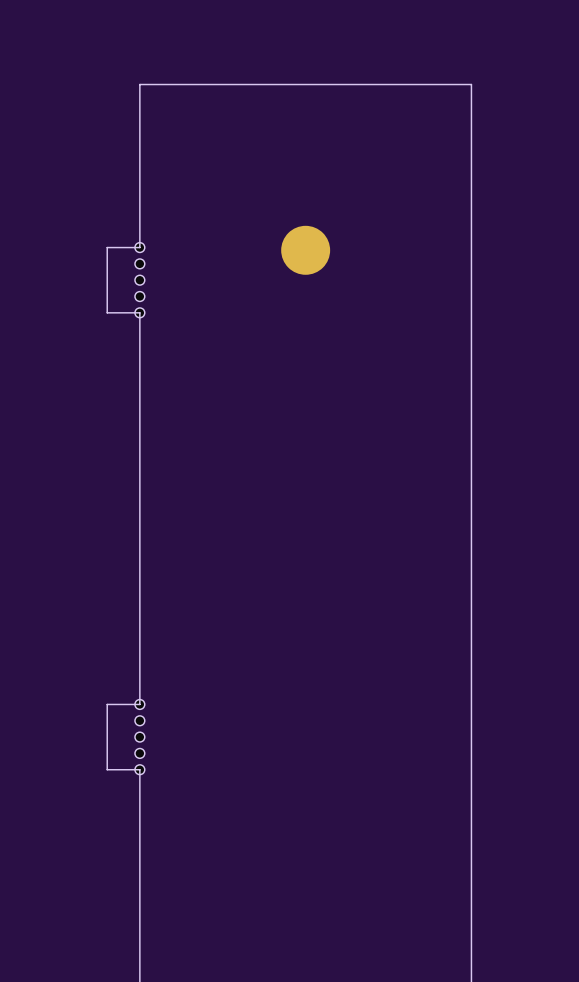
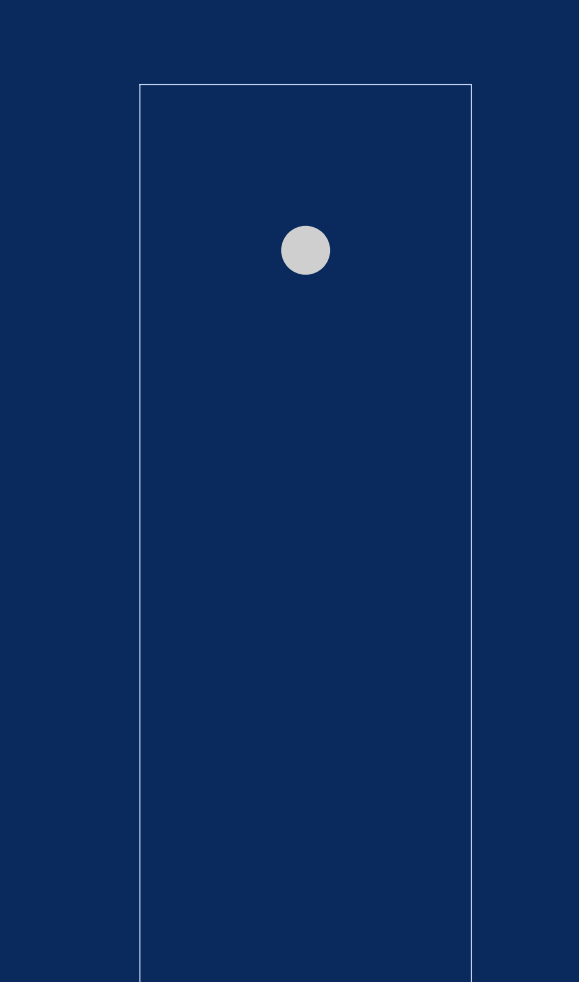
board edge: (139, 247) (107, 247) (107, 312) (139, 312) -> (139, 247) (139, 312)
hole: (139, 247) -> none
hole: (139, 263) -> none
hole: (139, 280) -> none
hole: (139, 296) -> none
hole: (139, 312) -> none
board edge: (139, 704) (107, 704) (107, 769) (139, 769) -> (139, 704) (139, 769)
hole: (139, 704) -> none
hole: (139, 720) -> none
hole: (139, 737) -> none
hole: (139, 753) -> none
hole: (139, 769) -> none

